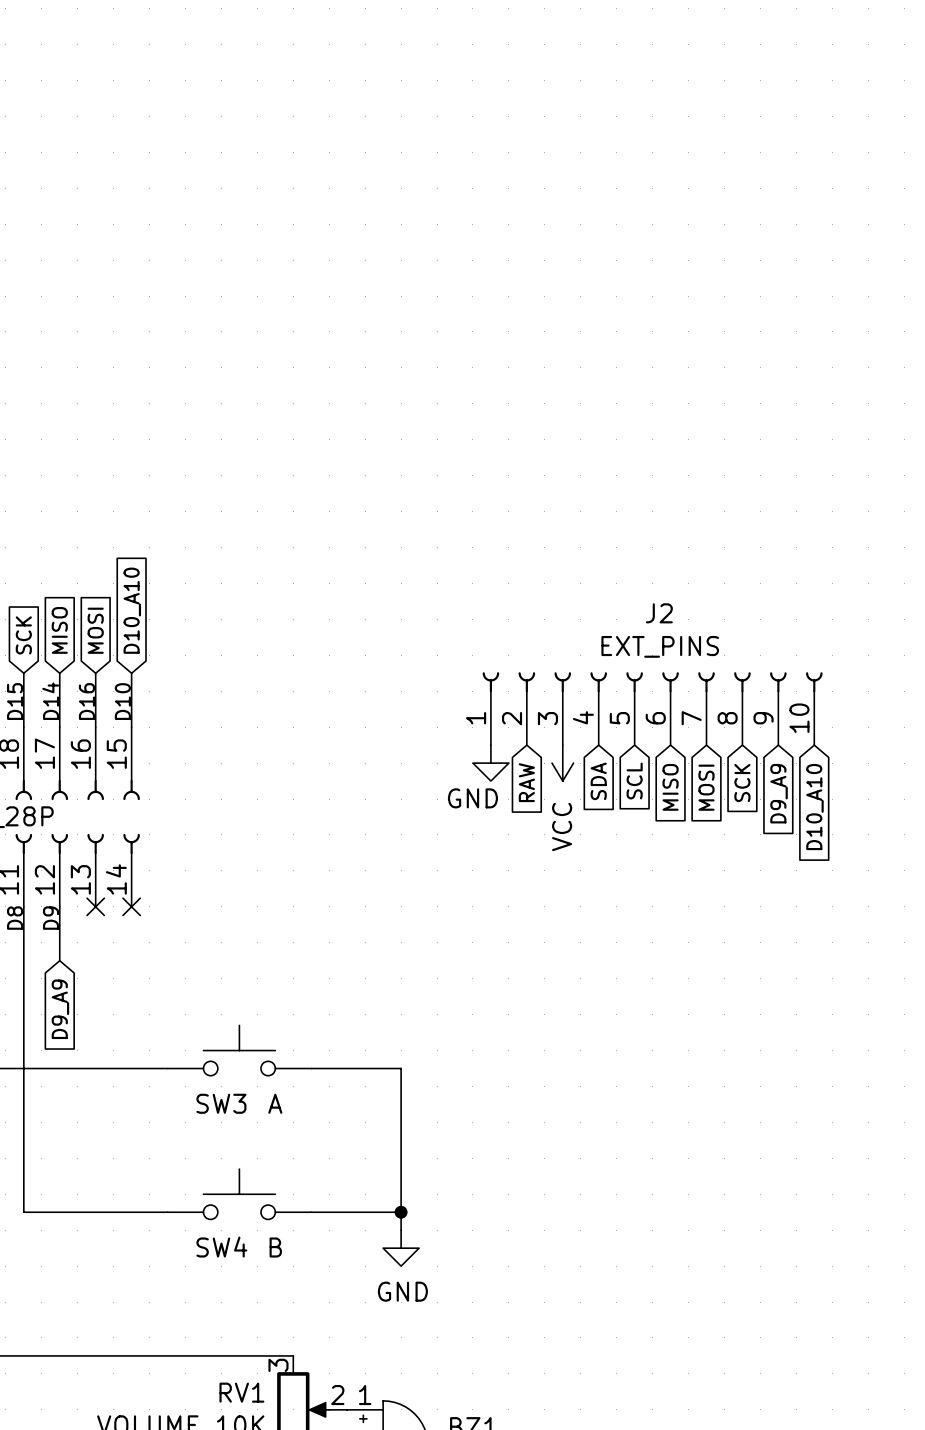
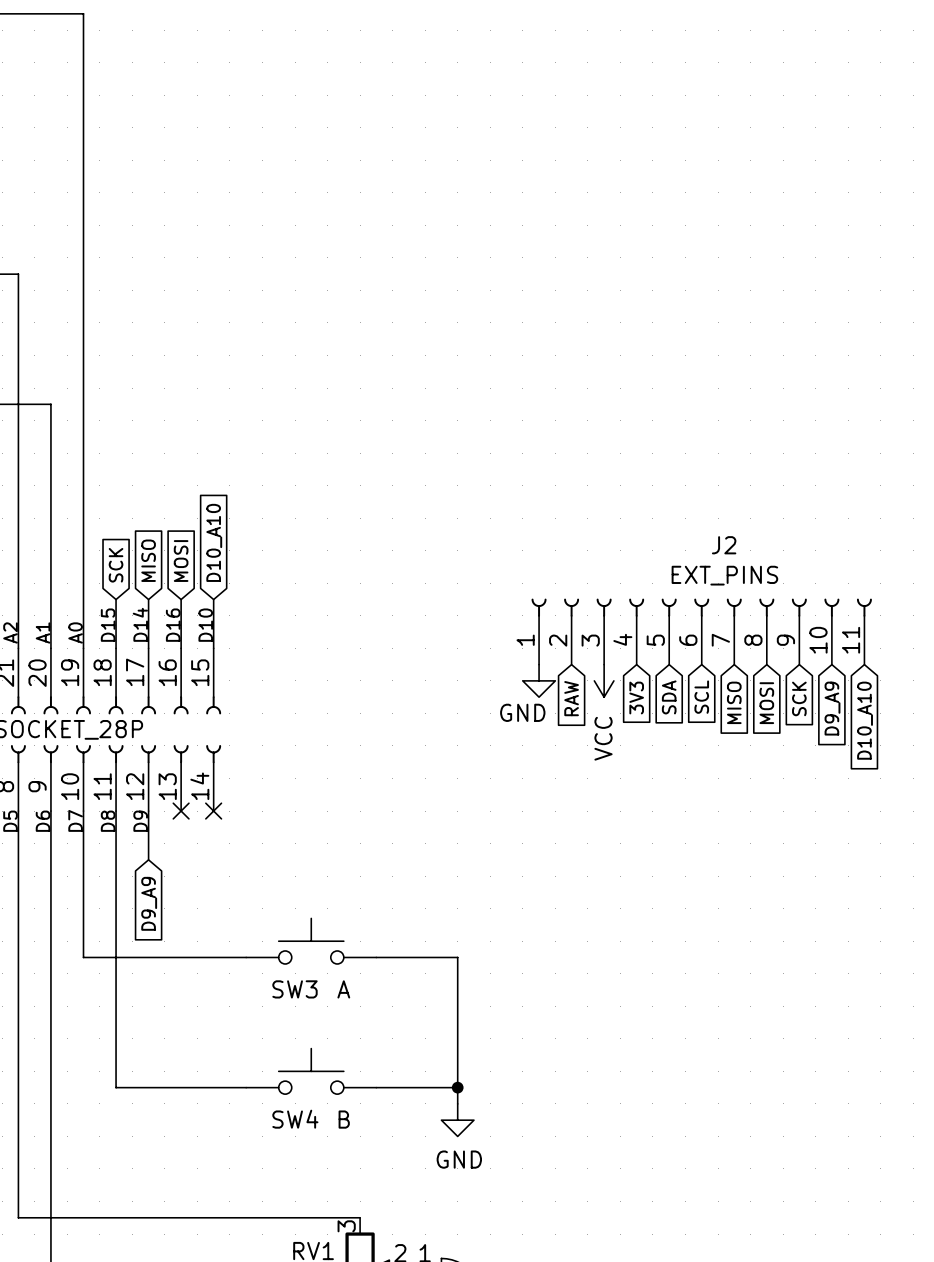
J2 symbol: [482, 672, 823, 746] -> [531, 598, 872, 665]
global label: SDA (598, 781) -> 3V3 (636, 698)
global label: SCL (634, 781) -> SDA (669, 697)
global label: SCK (742, 783) -> MOSI (766, 703)
global label: MISO (670, 787) -> SCL (701, 697)
global label: MOSI (706, 787) -> MISO (734, 702)
global label: D9_A9 (779, 793) -> SCK (799, 698)
global label: D10_A10 (814, 807) -> D9_A9 (832, 708)
global label: none -> D10_A10 (865, 720)

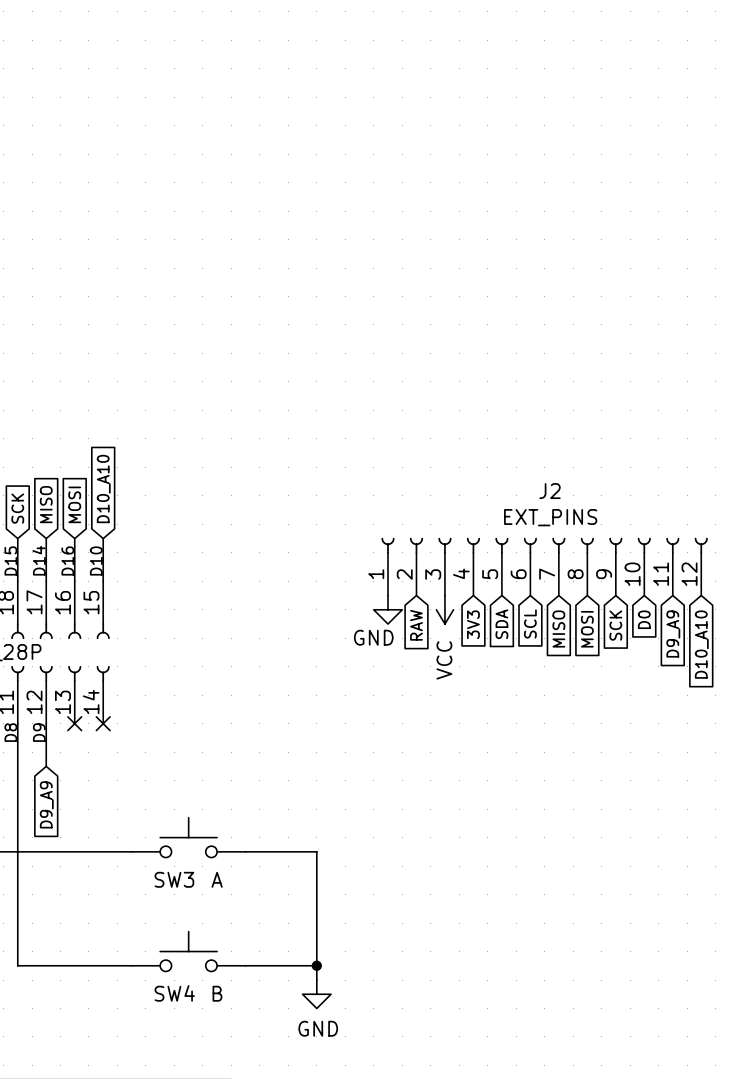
J2 symbol: [531, 598, 872, 665] -> [381, 537, 708, 596]
global label: D9_A9 (832, 708) -> D0 (644, 619)
global label: D10_A10 (865, 720) -> D9_A9 (673, 634)
global label: none -> D10_A10 (701, 644)

